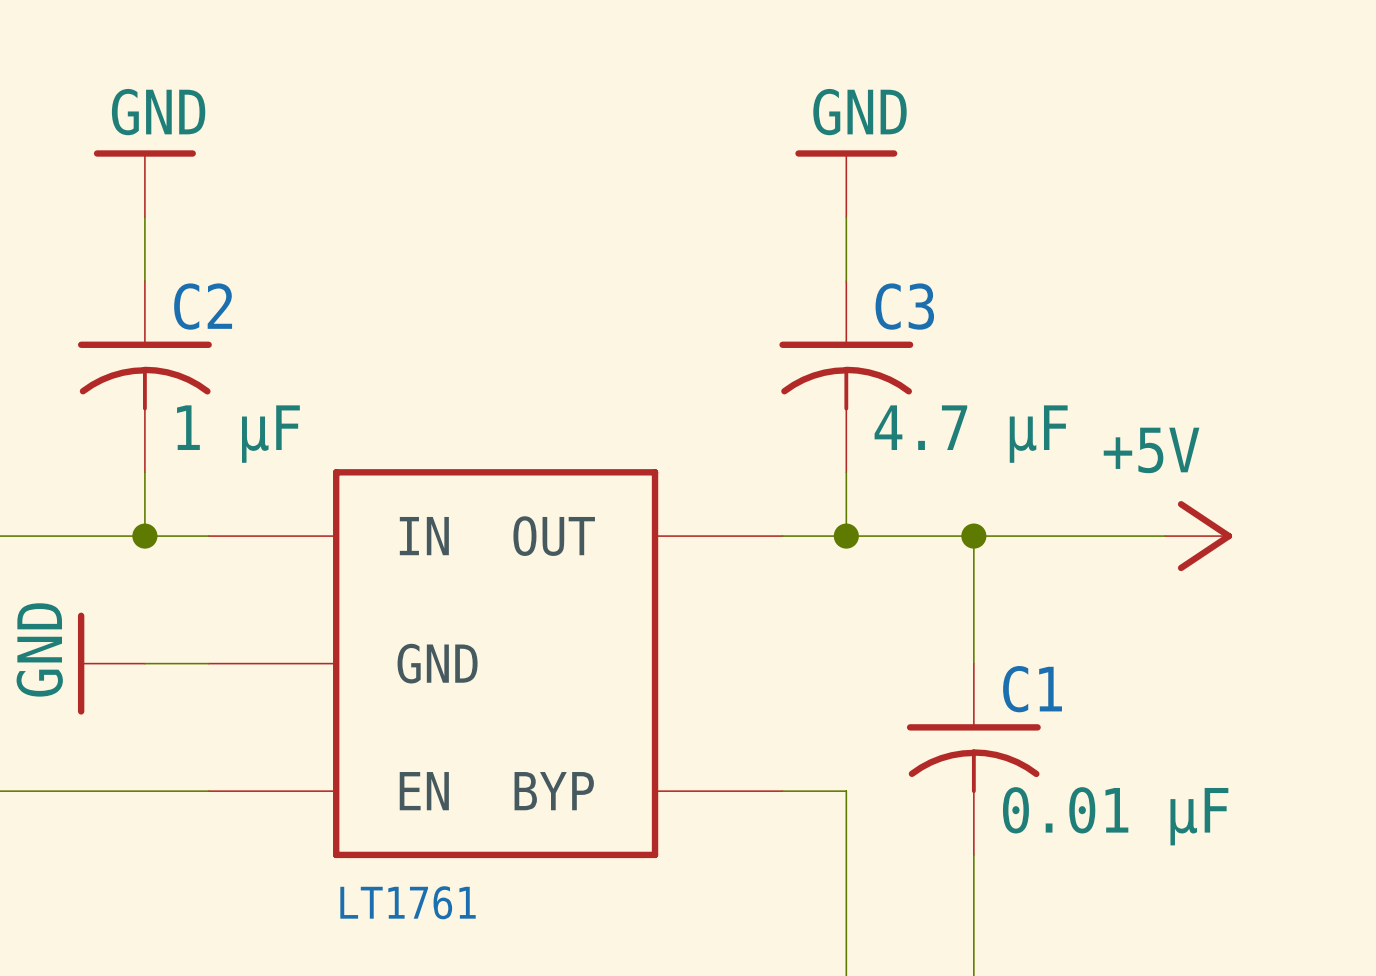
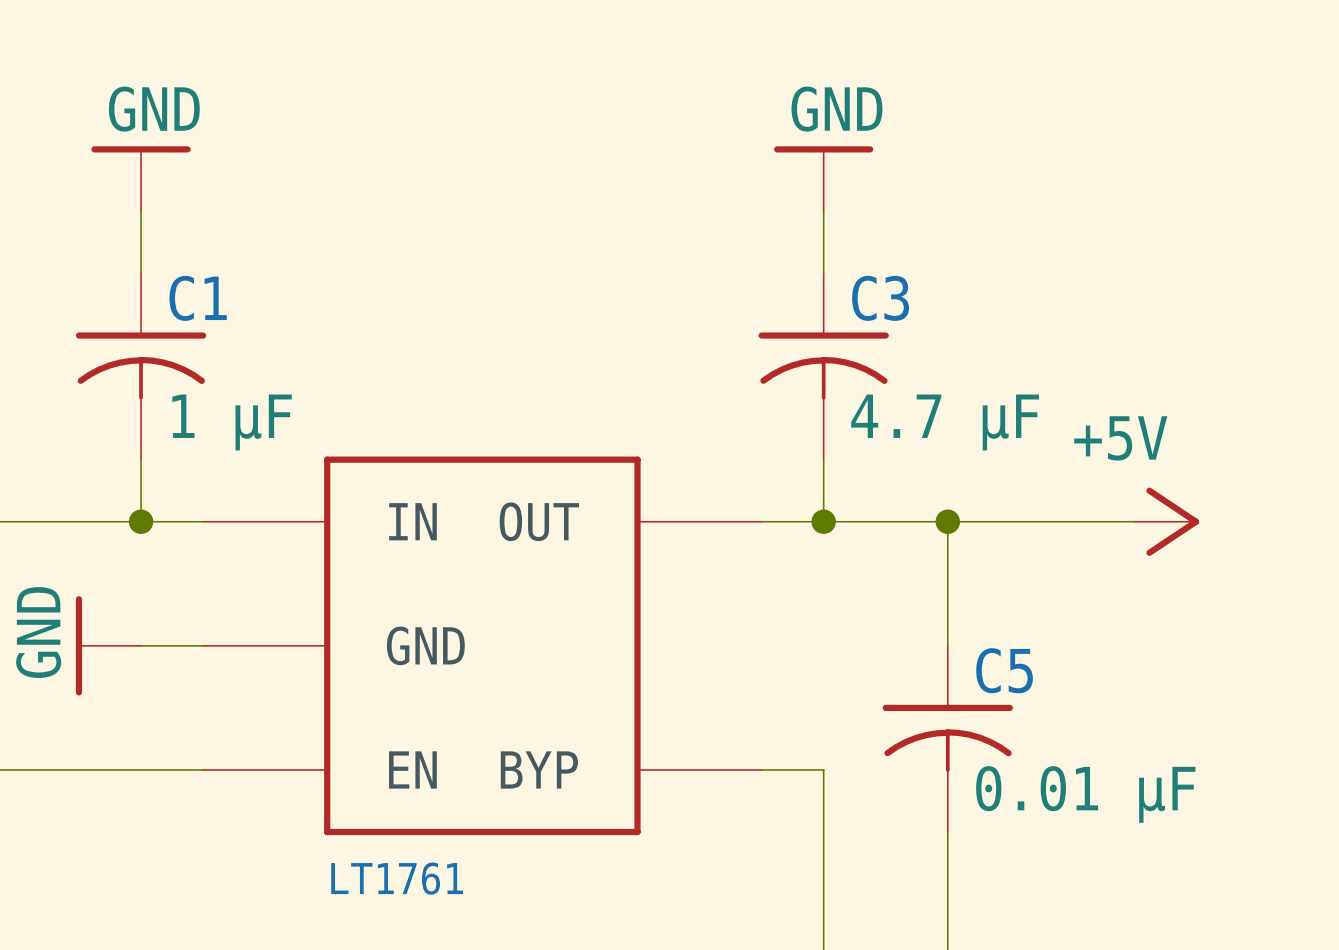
C2 name: C2 (203, 306) -> C1 (198, 298)
C1 name: C1 (1032, 689) -> C5 (1004, 670)

